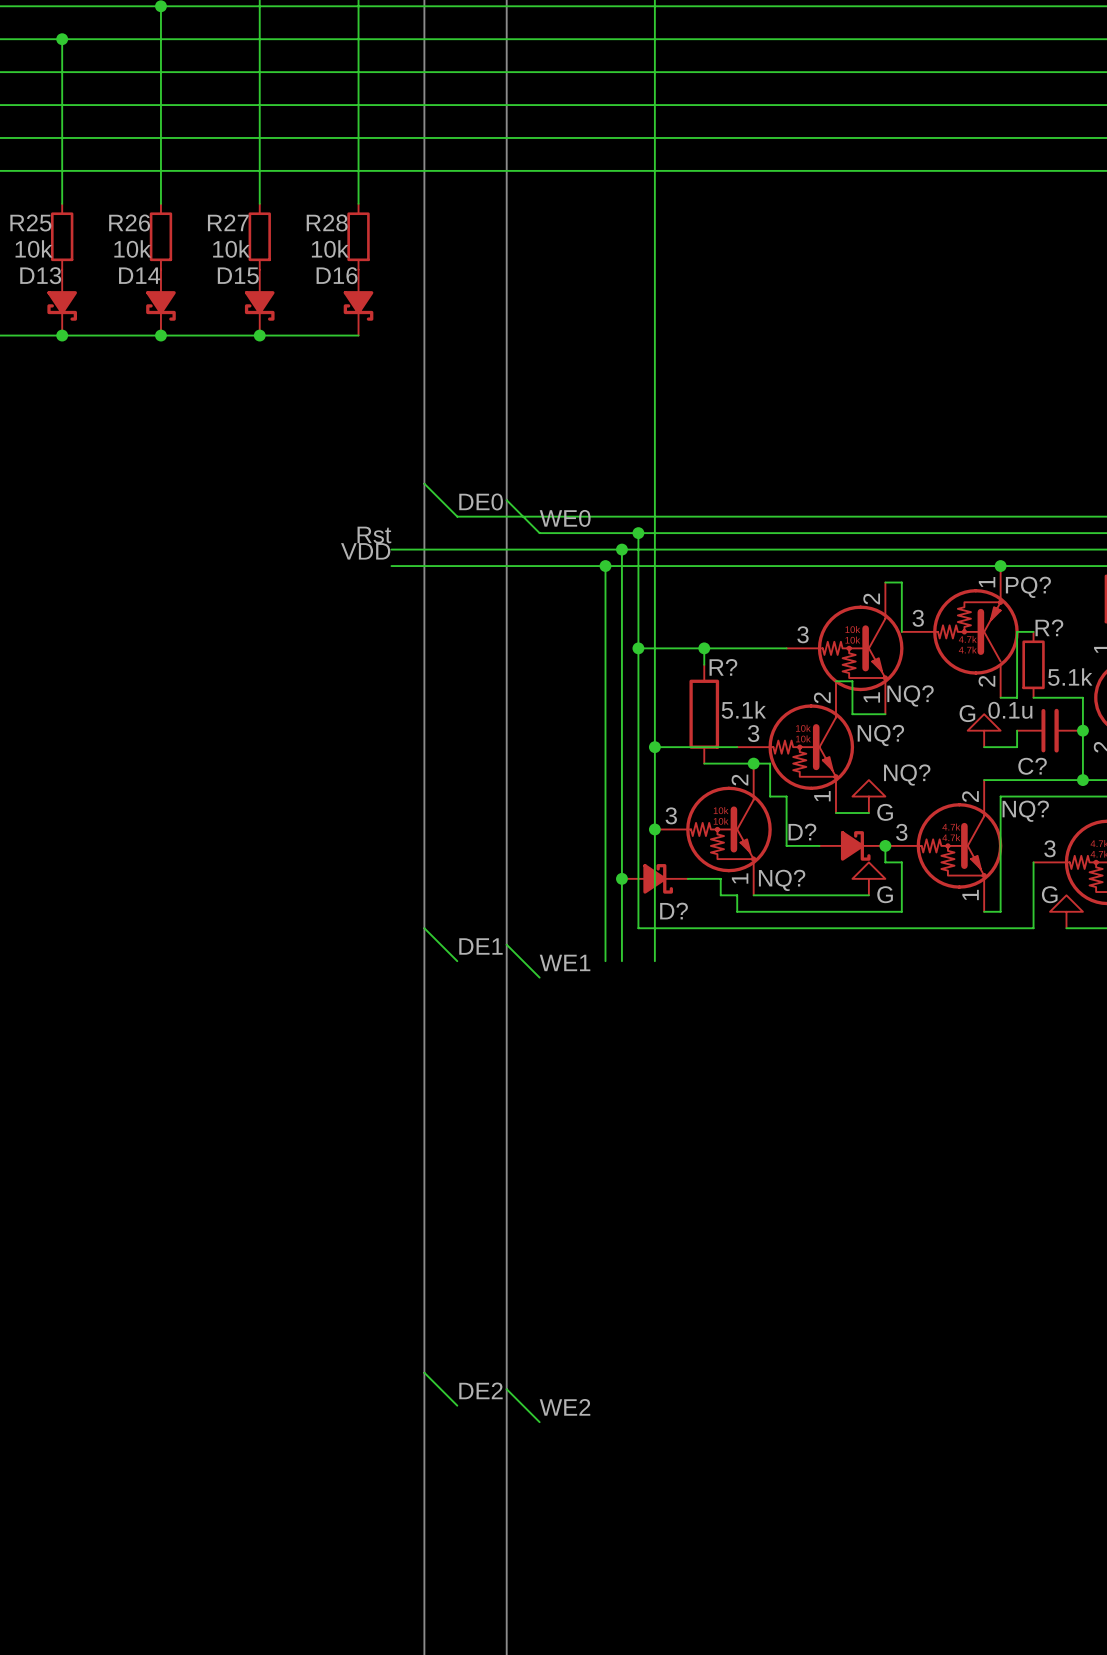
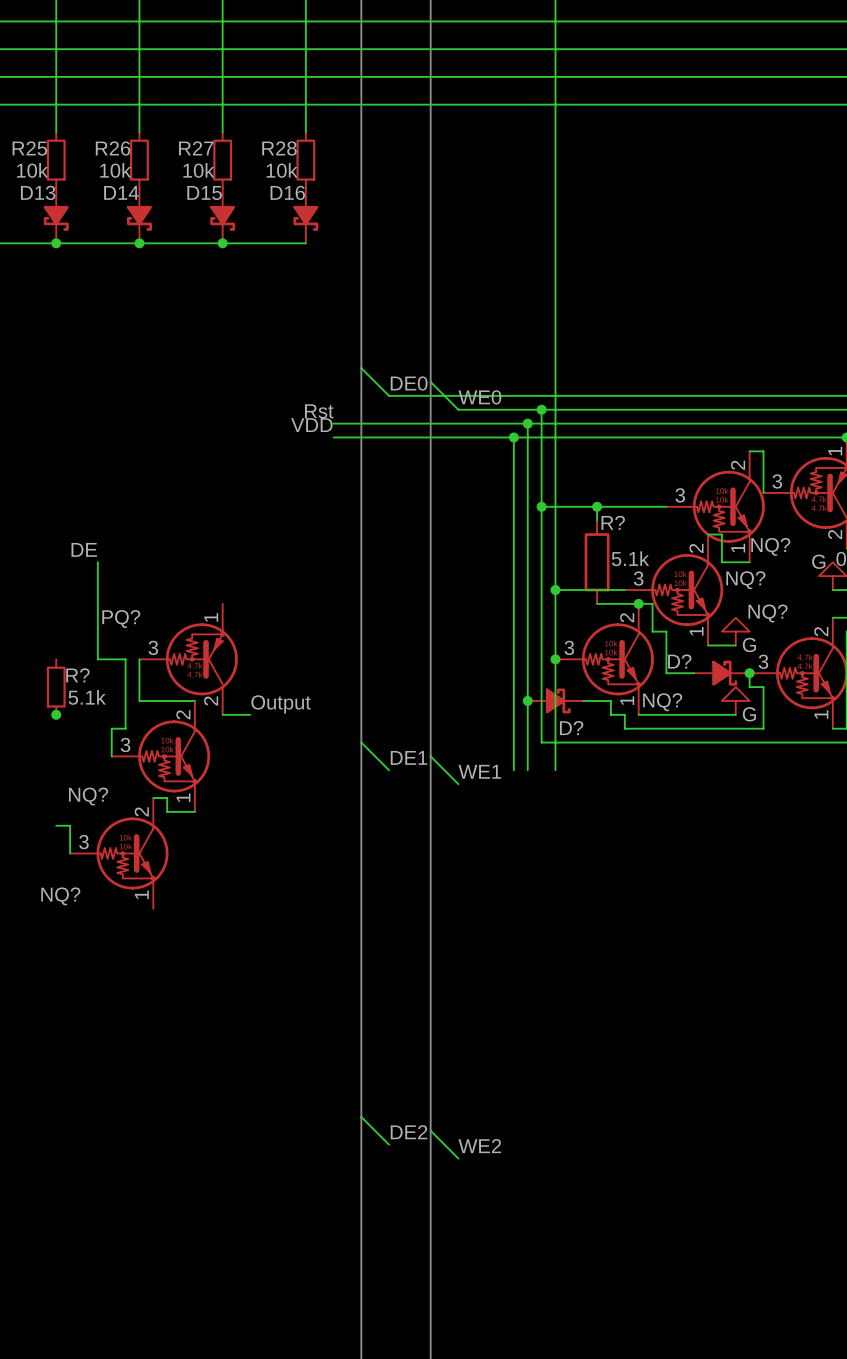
label: none -> DE (84, 549)
wire: none -> (97, 562) (97, 659) (125, 659) (125, 728) (111, 728) (111, 756)
wire: none -> (139, 659) (139, 700) (194, 700)
PQ?: none -> (188, 659)
R?: none -> 5.1k (56, 687)
label: none -> Output (281, 704)
junction: none -> (56, 714)
wire: none -> (222, 714) (250, 714)
NQ?: none -> (160, 756)
wire: none -> (153, 798) (167, 798) (167, 811) (194, 811)
wire: none -> (56, 825) (70, 825) (70, 853)
NQ?: none -> (119, 853)

